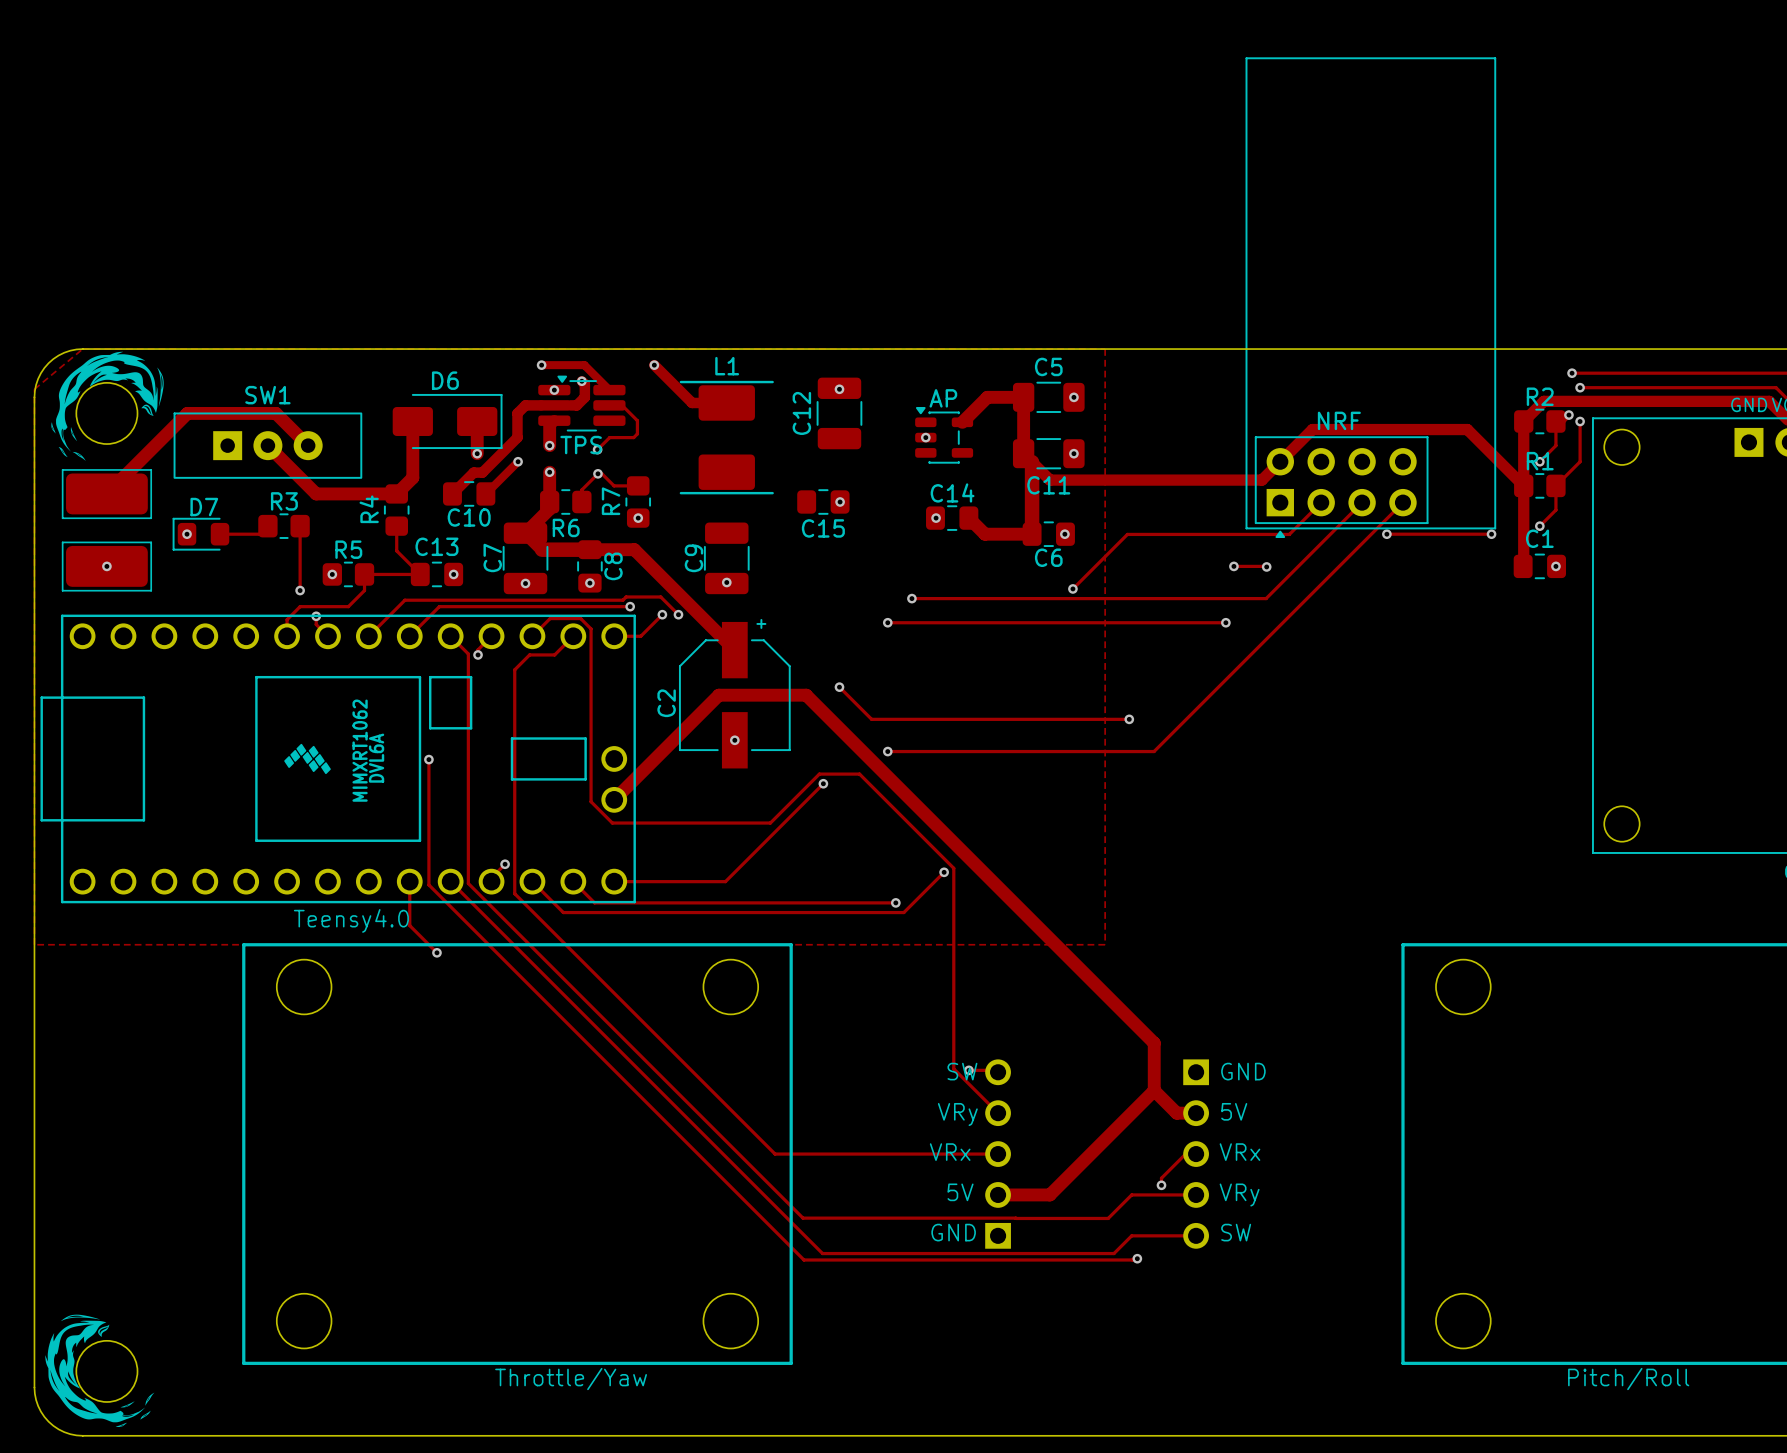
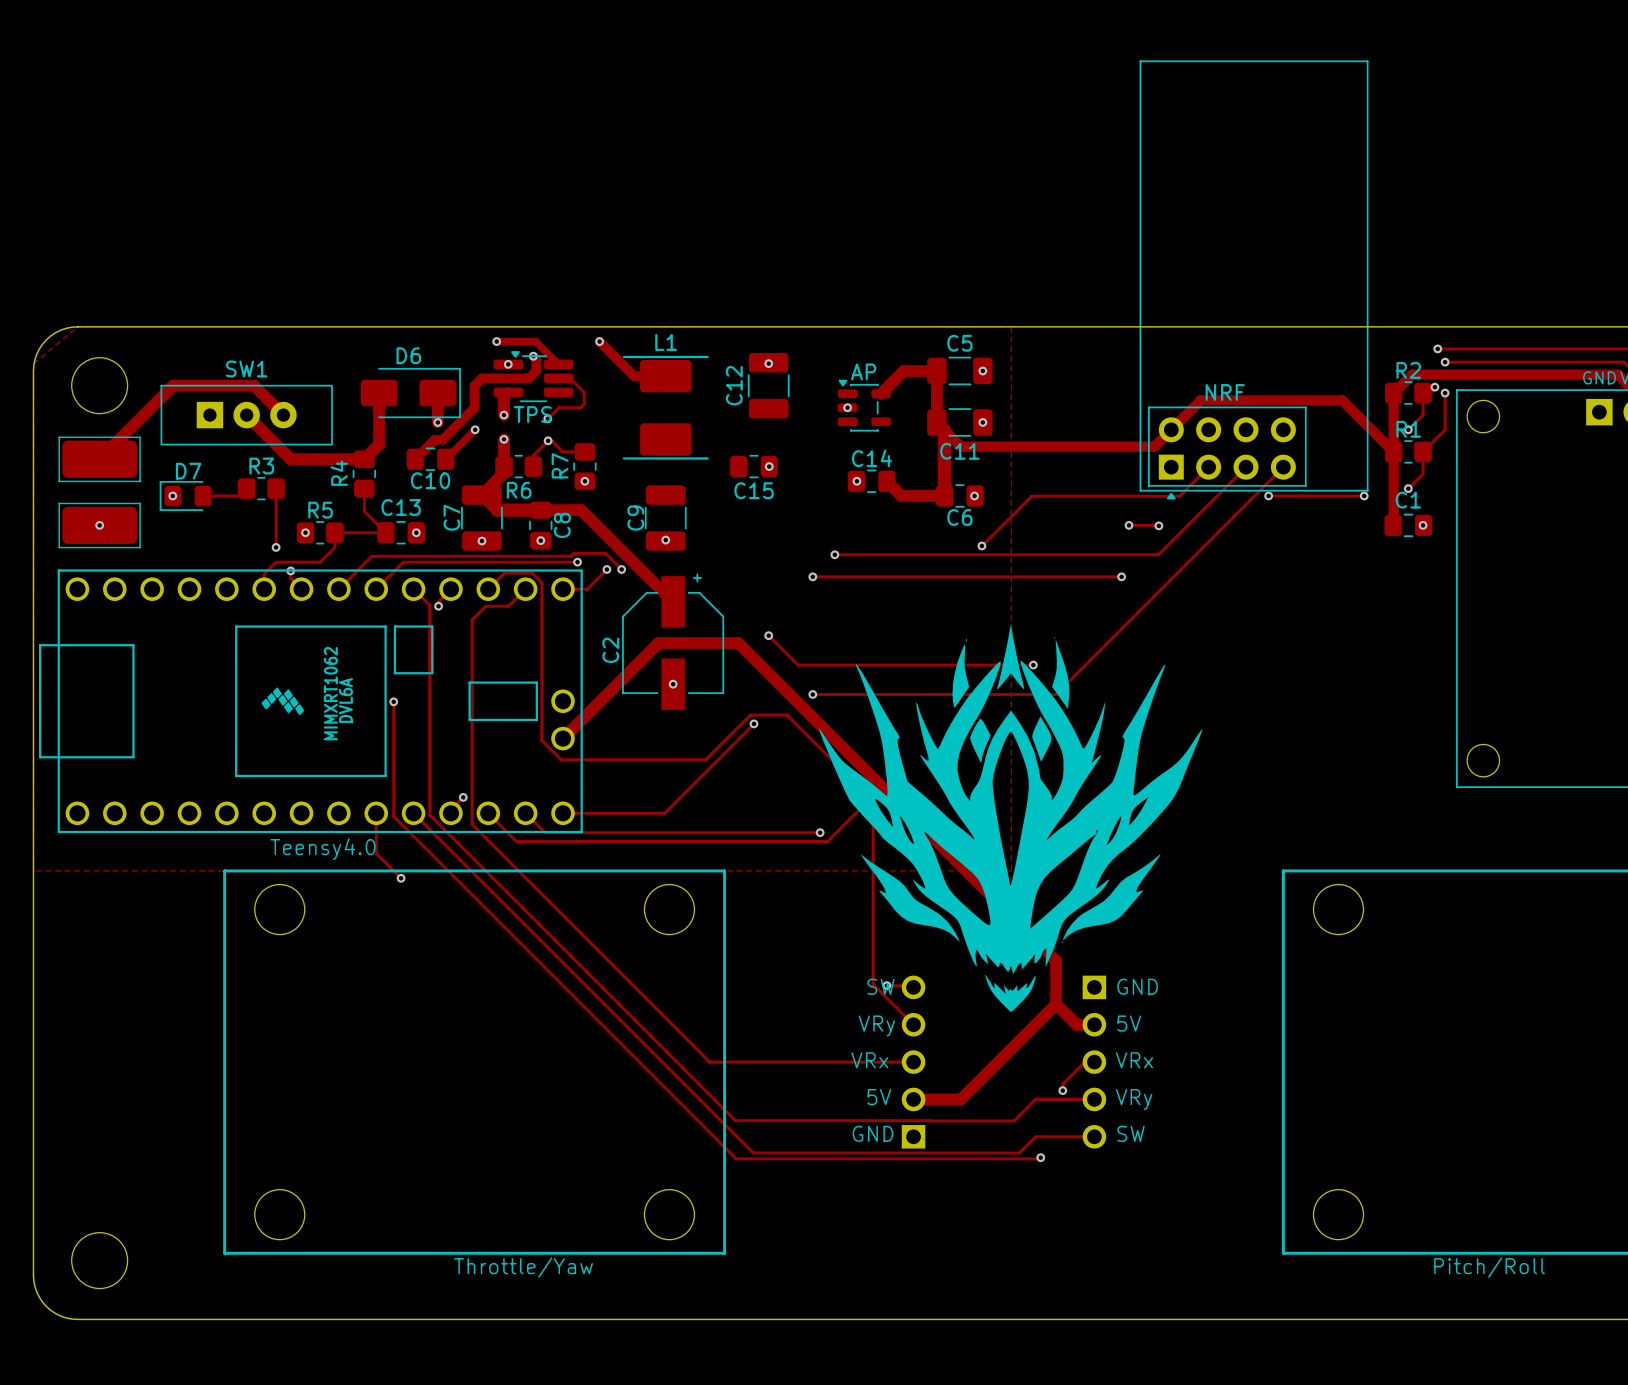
drawing: [51, 351, 164, 461] -> none
drawing: none -> [819, 624, 1203, 1013]
drawing: [45, 1314, 155, 1427] -> none

